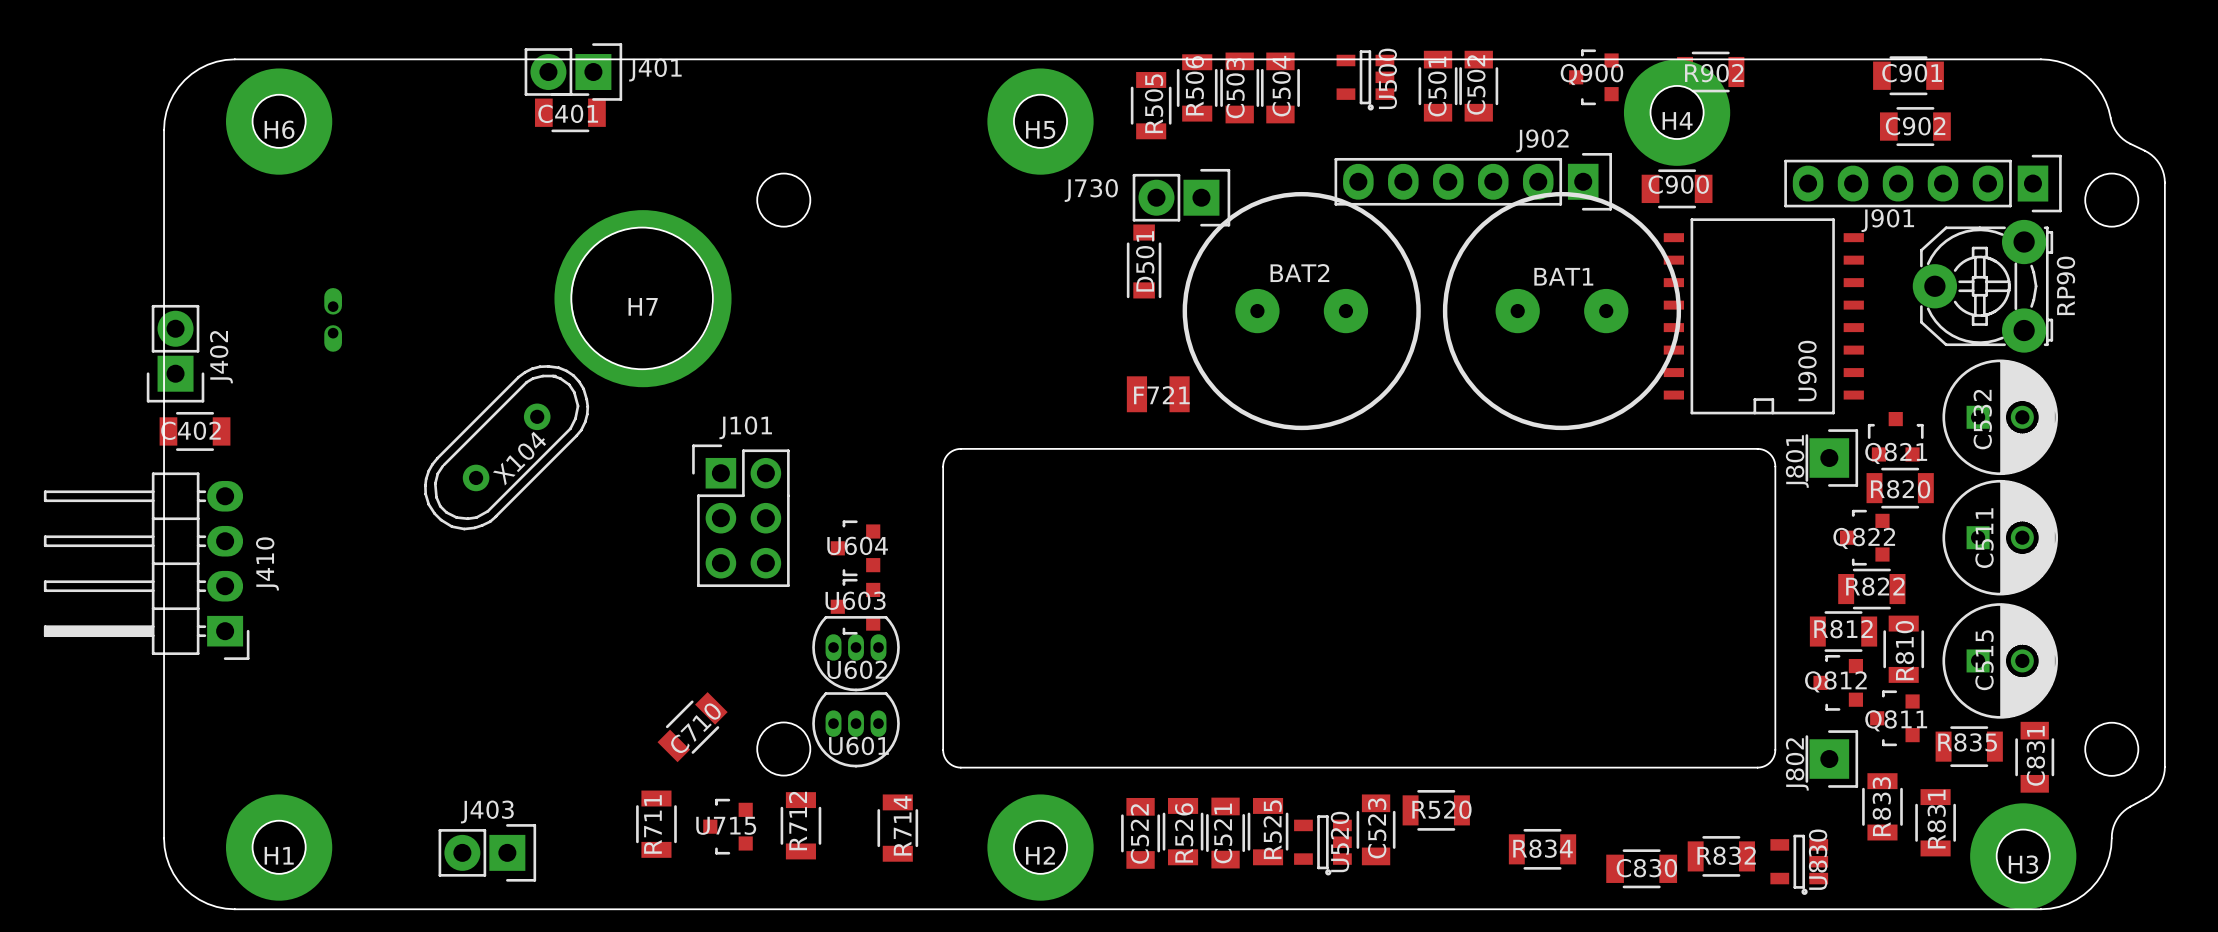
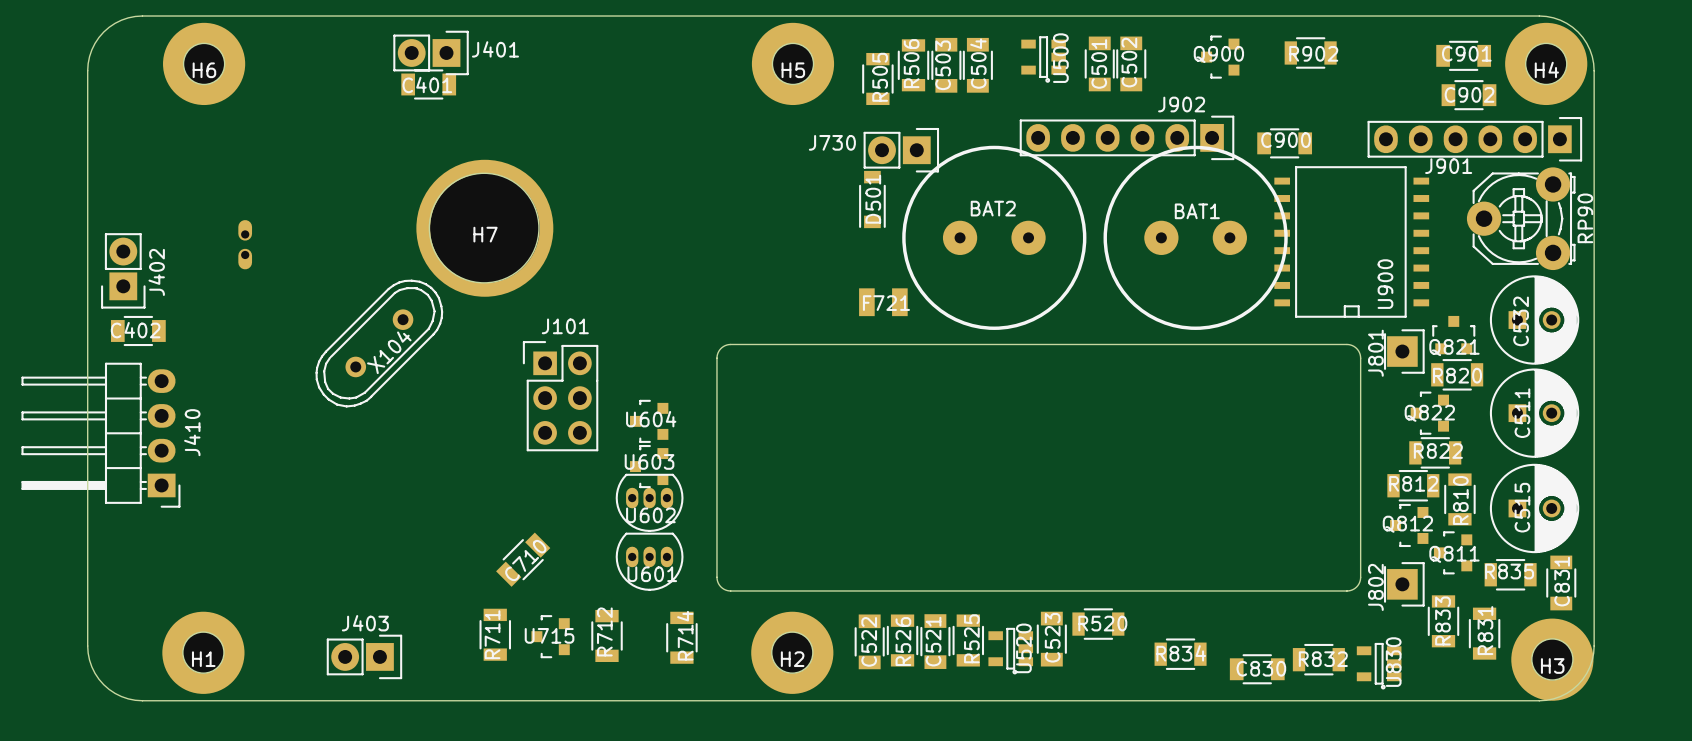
board edge: none -> (142, 16) (1539, 16) (1560, 20) (1572, 27) (1586, 43) (1592, 56) (1594, 70) (1594, 645) (1589, 666) (1582, 679) (1572, 689) (1553, 698) (1539, 700) (142, 700) (121, 696) (109, 689) (99, 679) (89, 660) (87, 645) (87, 70) (91, 49) (103, 32) (121, 20) (142, 16)
round board edge: [1649, 85, 1705, 140] -> none
H4 position: (1677, 112) -> (1546, 63)
board edge: (2110, 117) (2102, 94) (2086, 75) (2065, 63) (2040, 59) (234, 59) (207, 64) (191, 73) (178, 87) (166, 111) (164, 130) (164, 838) (169, 865) (184, 888) (207, 903) (234, 909) (2040, 909) (2068, 903) (2091, 888) (2106, 865) (2111, 838) -> none
board edge: (2110, 118) (2115, 129) (2123, 139) (2148, 152) (2157, 160) (2162, 170) (2164, 182) -> none
H6 position: (279, 121) -> (204, 63)
round board edge position: (279, 121) -> (204, 63)
H5 position: (1040, 121) -> (792, 63)
round board edge position: (1040, 121) -> (792, 63)
round board edge: [756, 172, 812, 228] -> none
board edge: (2164, 182) (2164, 766) -> none
round board edge position: (2111, 200) -> (1546, 63)
round board edge: [756, 721, 812, 777] -> none
round board edge: [2084, 721, 2140, 777] -> none
board edge: (2164, 766) (2163, 778) (2157, 788) (2149, 796) (2121, 813) (2115, 822) (2111, 837) -> none

